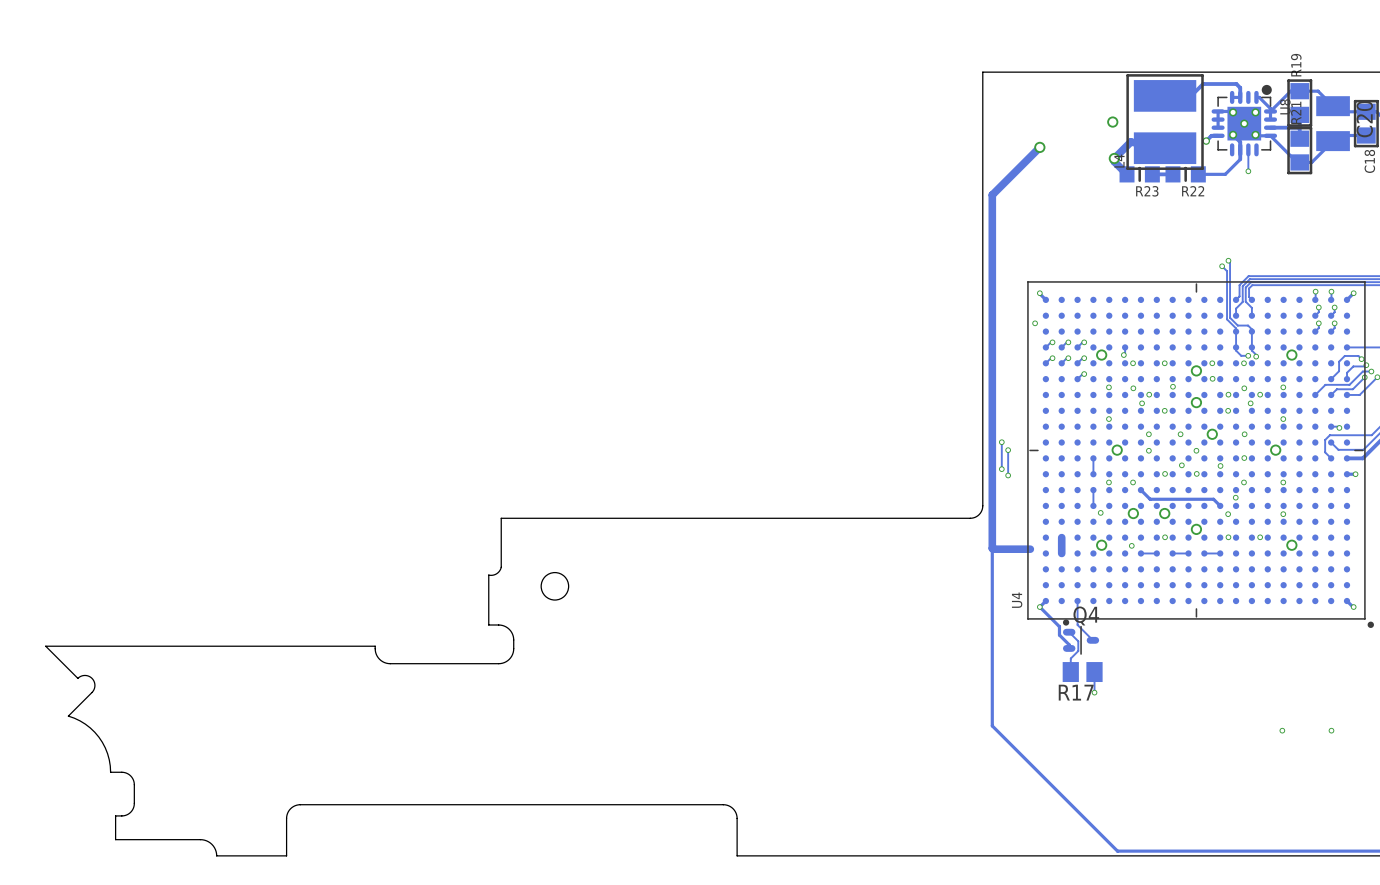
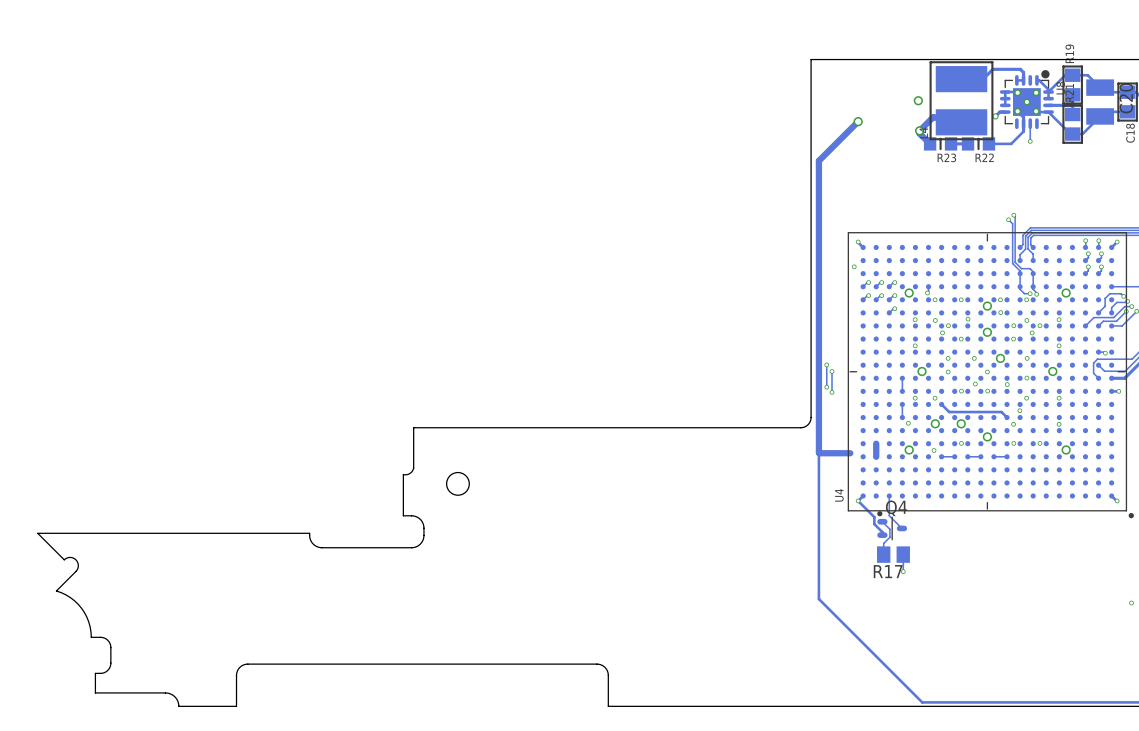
via: (1282, 730) -> none
via position: (1331, 730) -> (1131, 603)

